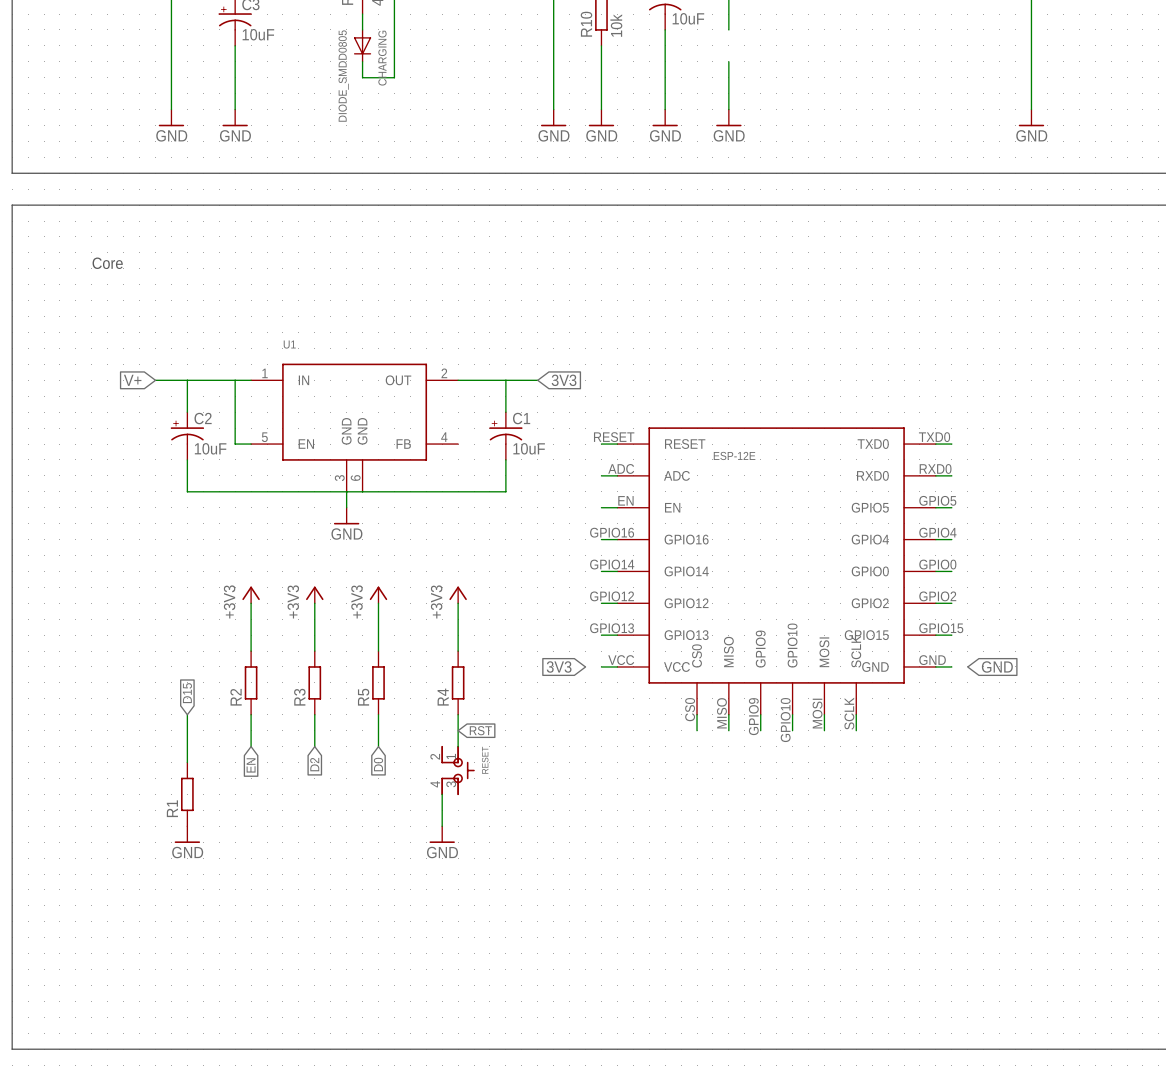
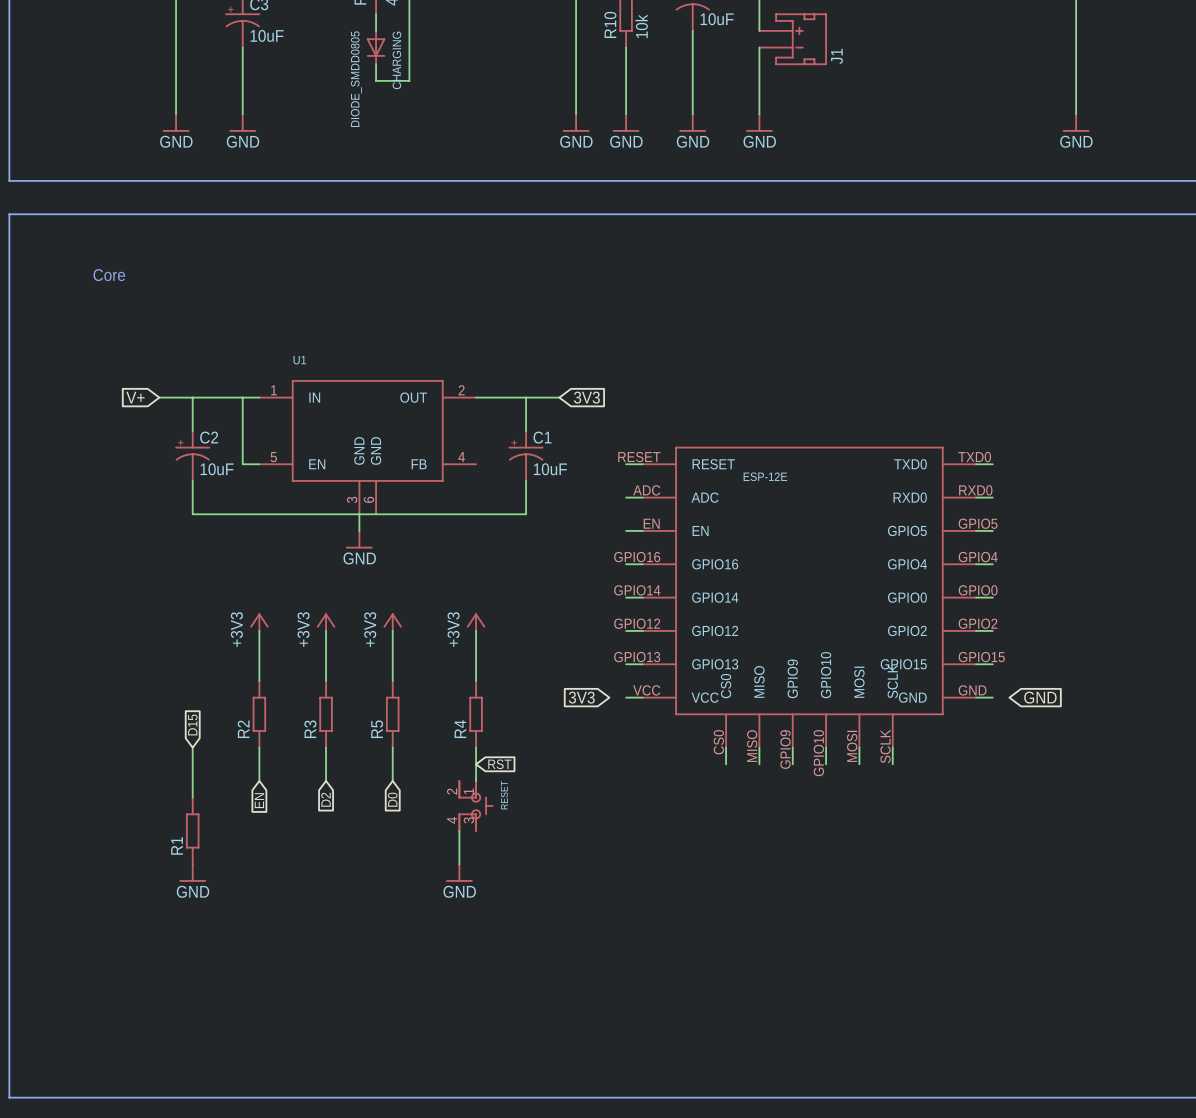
J1: none -> (793, 39)
wire: none -> (759, 47) (759, 64)

